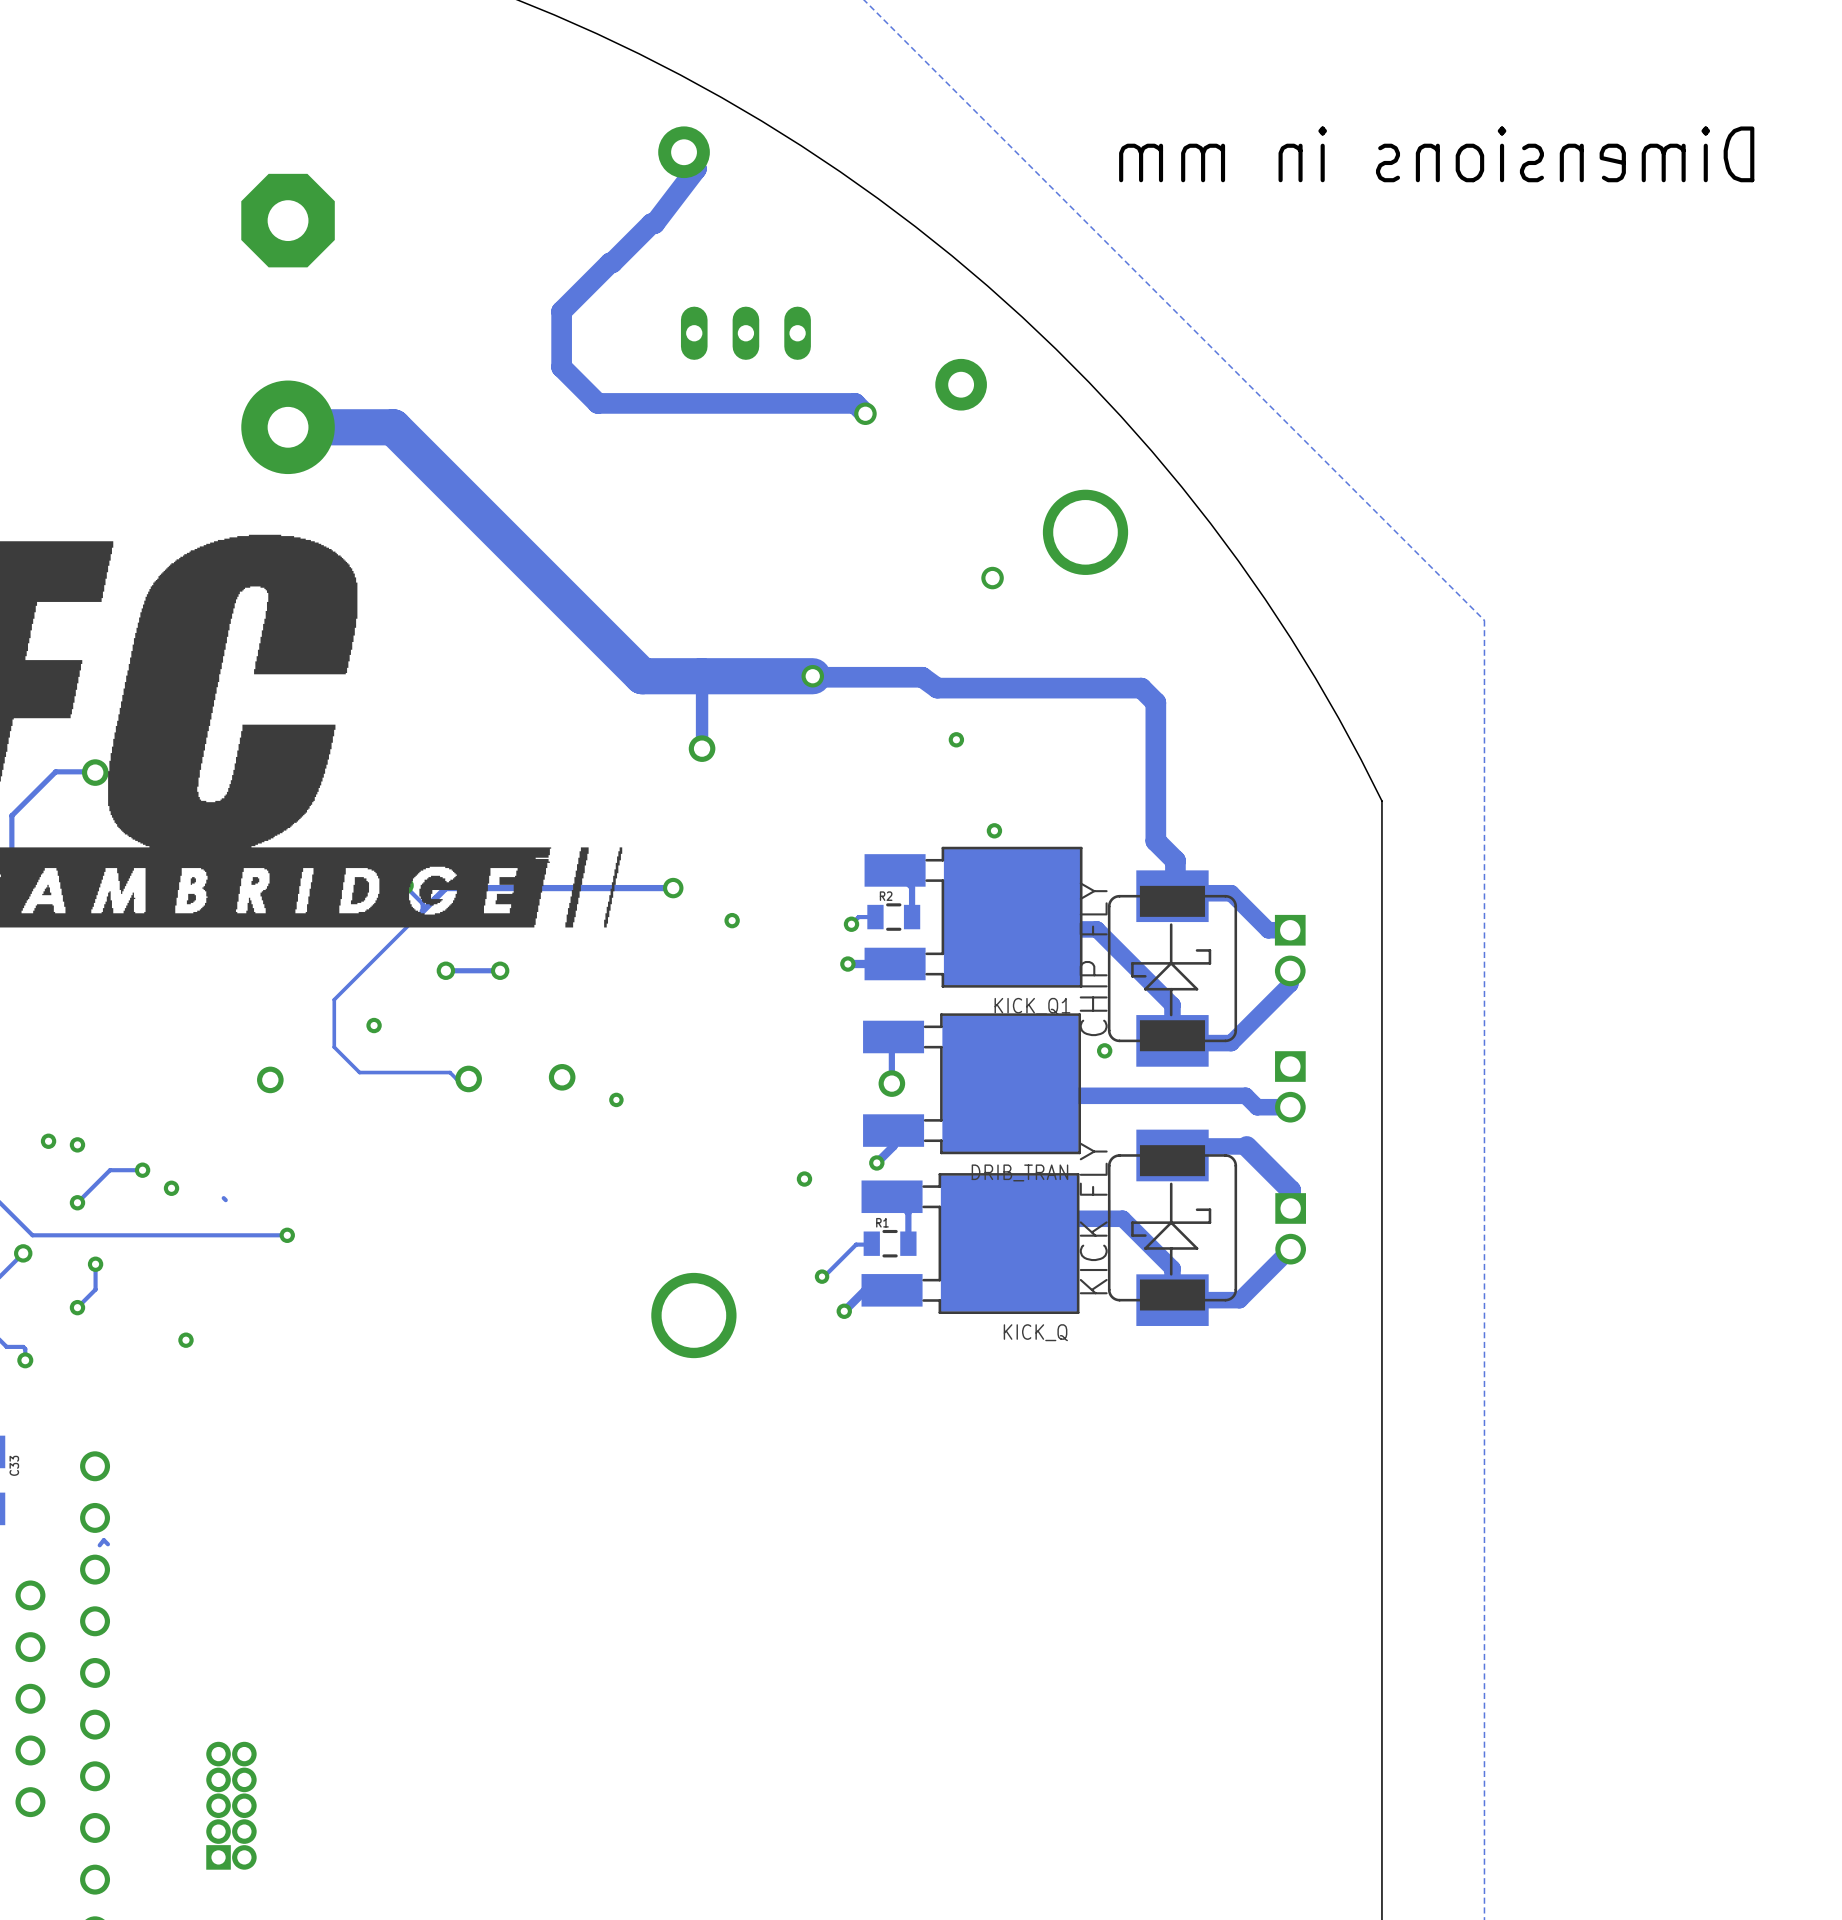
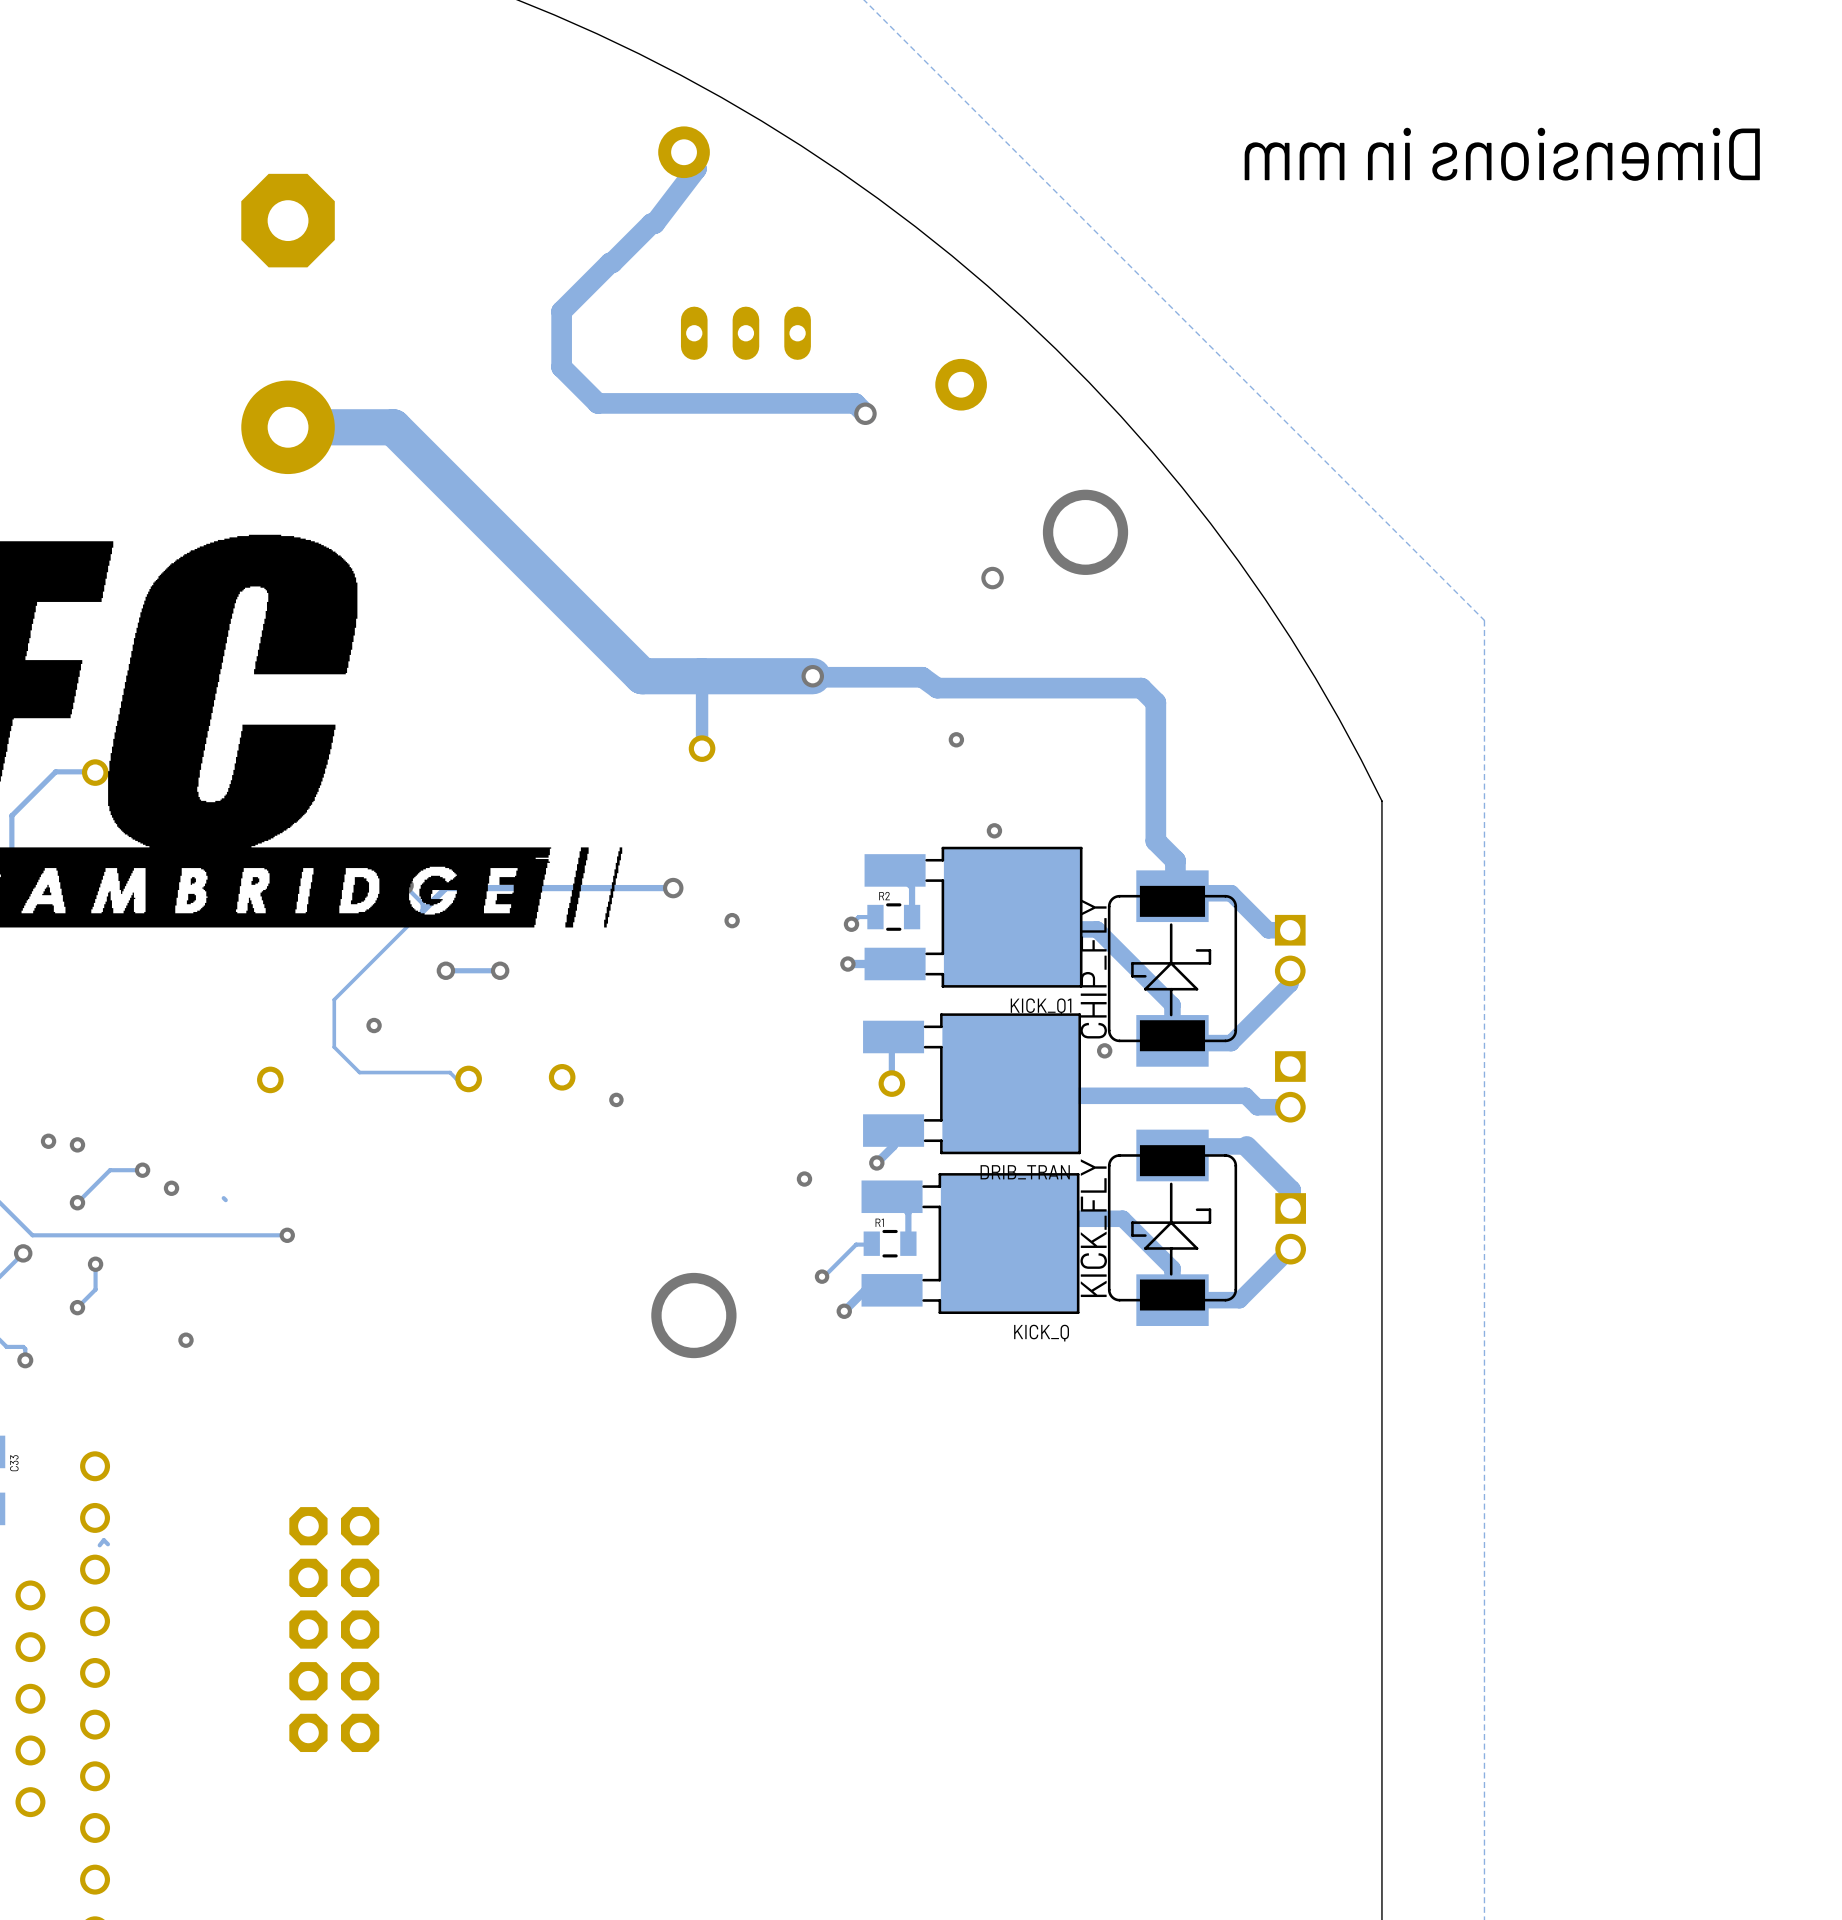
part: none -> (334, 1629)
part: (231, 1805) -> none

